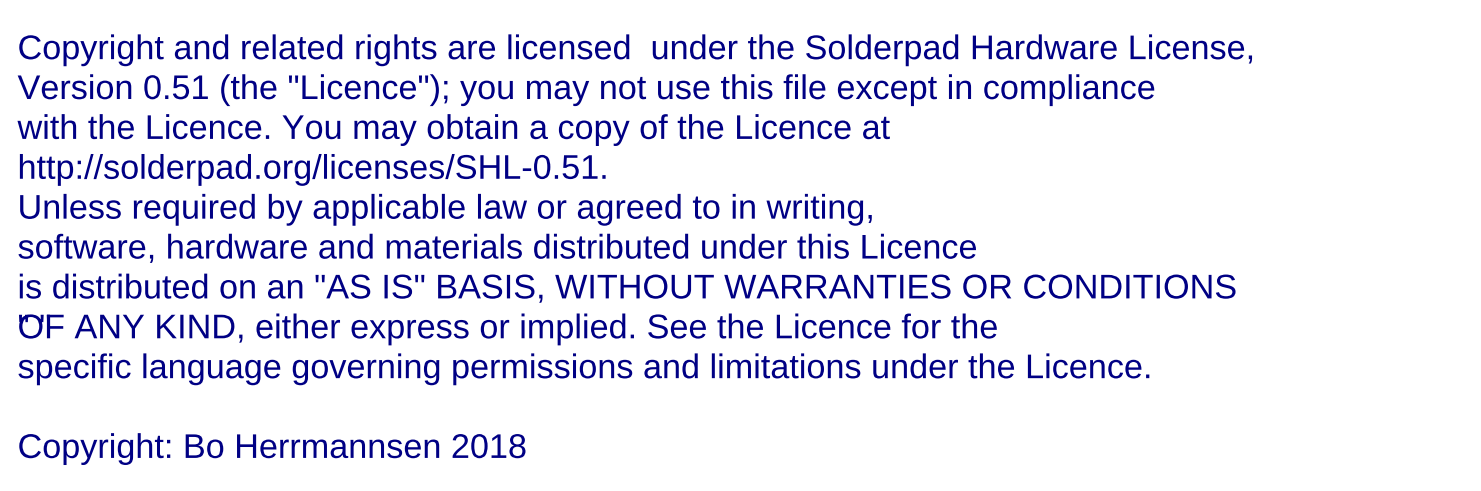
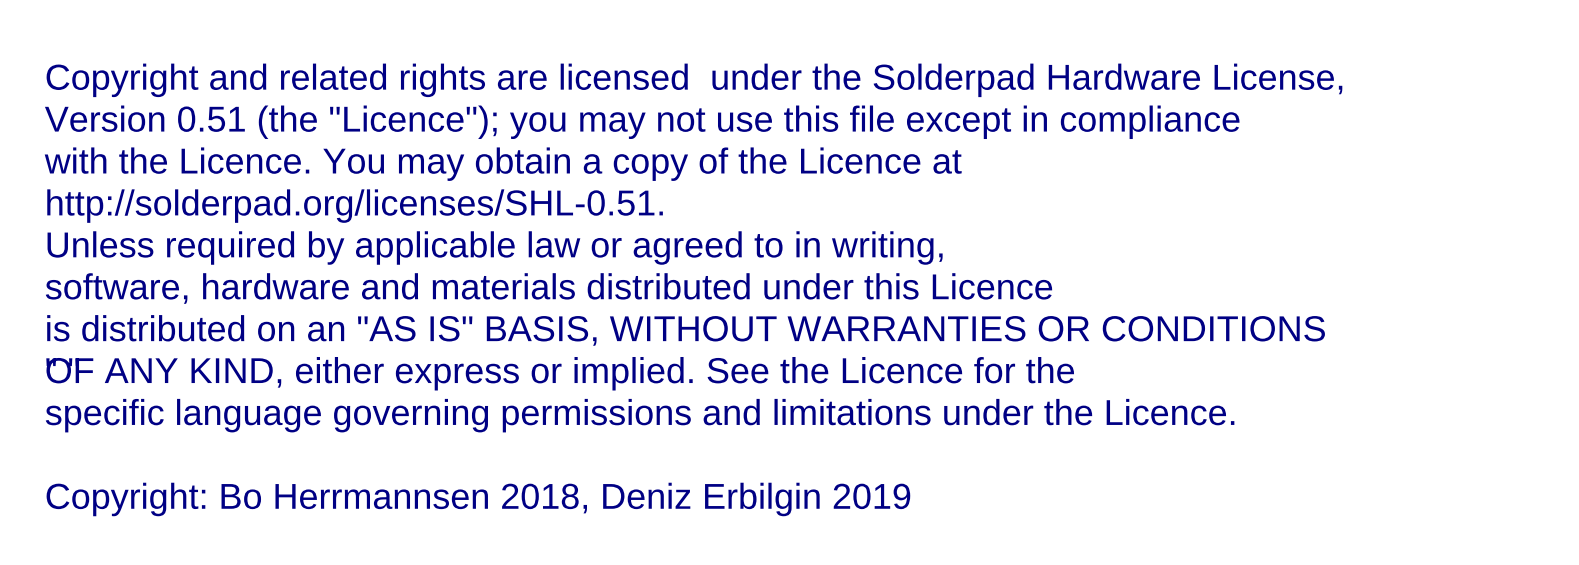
text: Copyright: Bo Herrmannsen 2018 (272, 449) -> Copyright: Bo Herrmannsen 2018, Deniz Erbilgin 2019 (478, 499)

